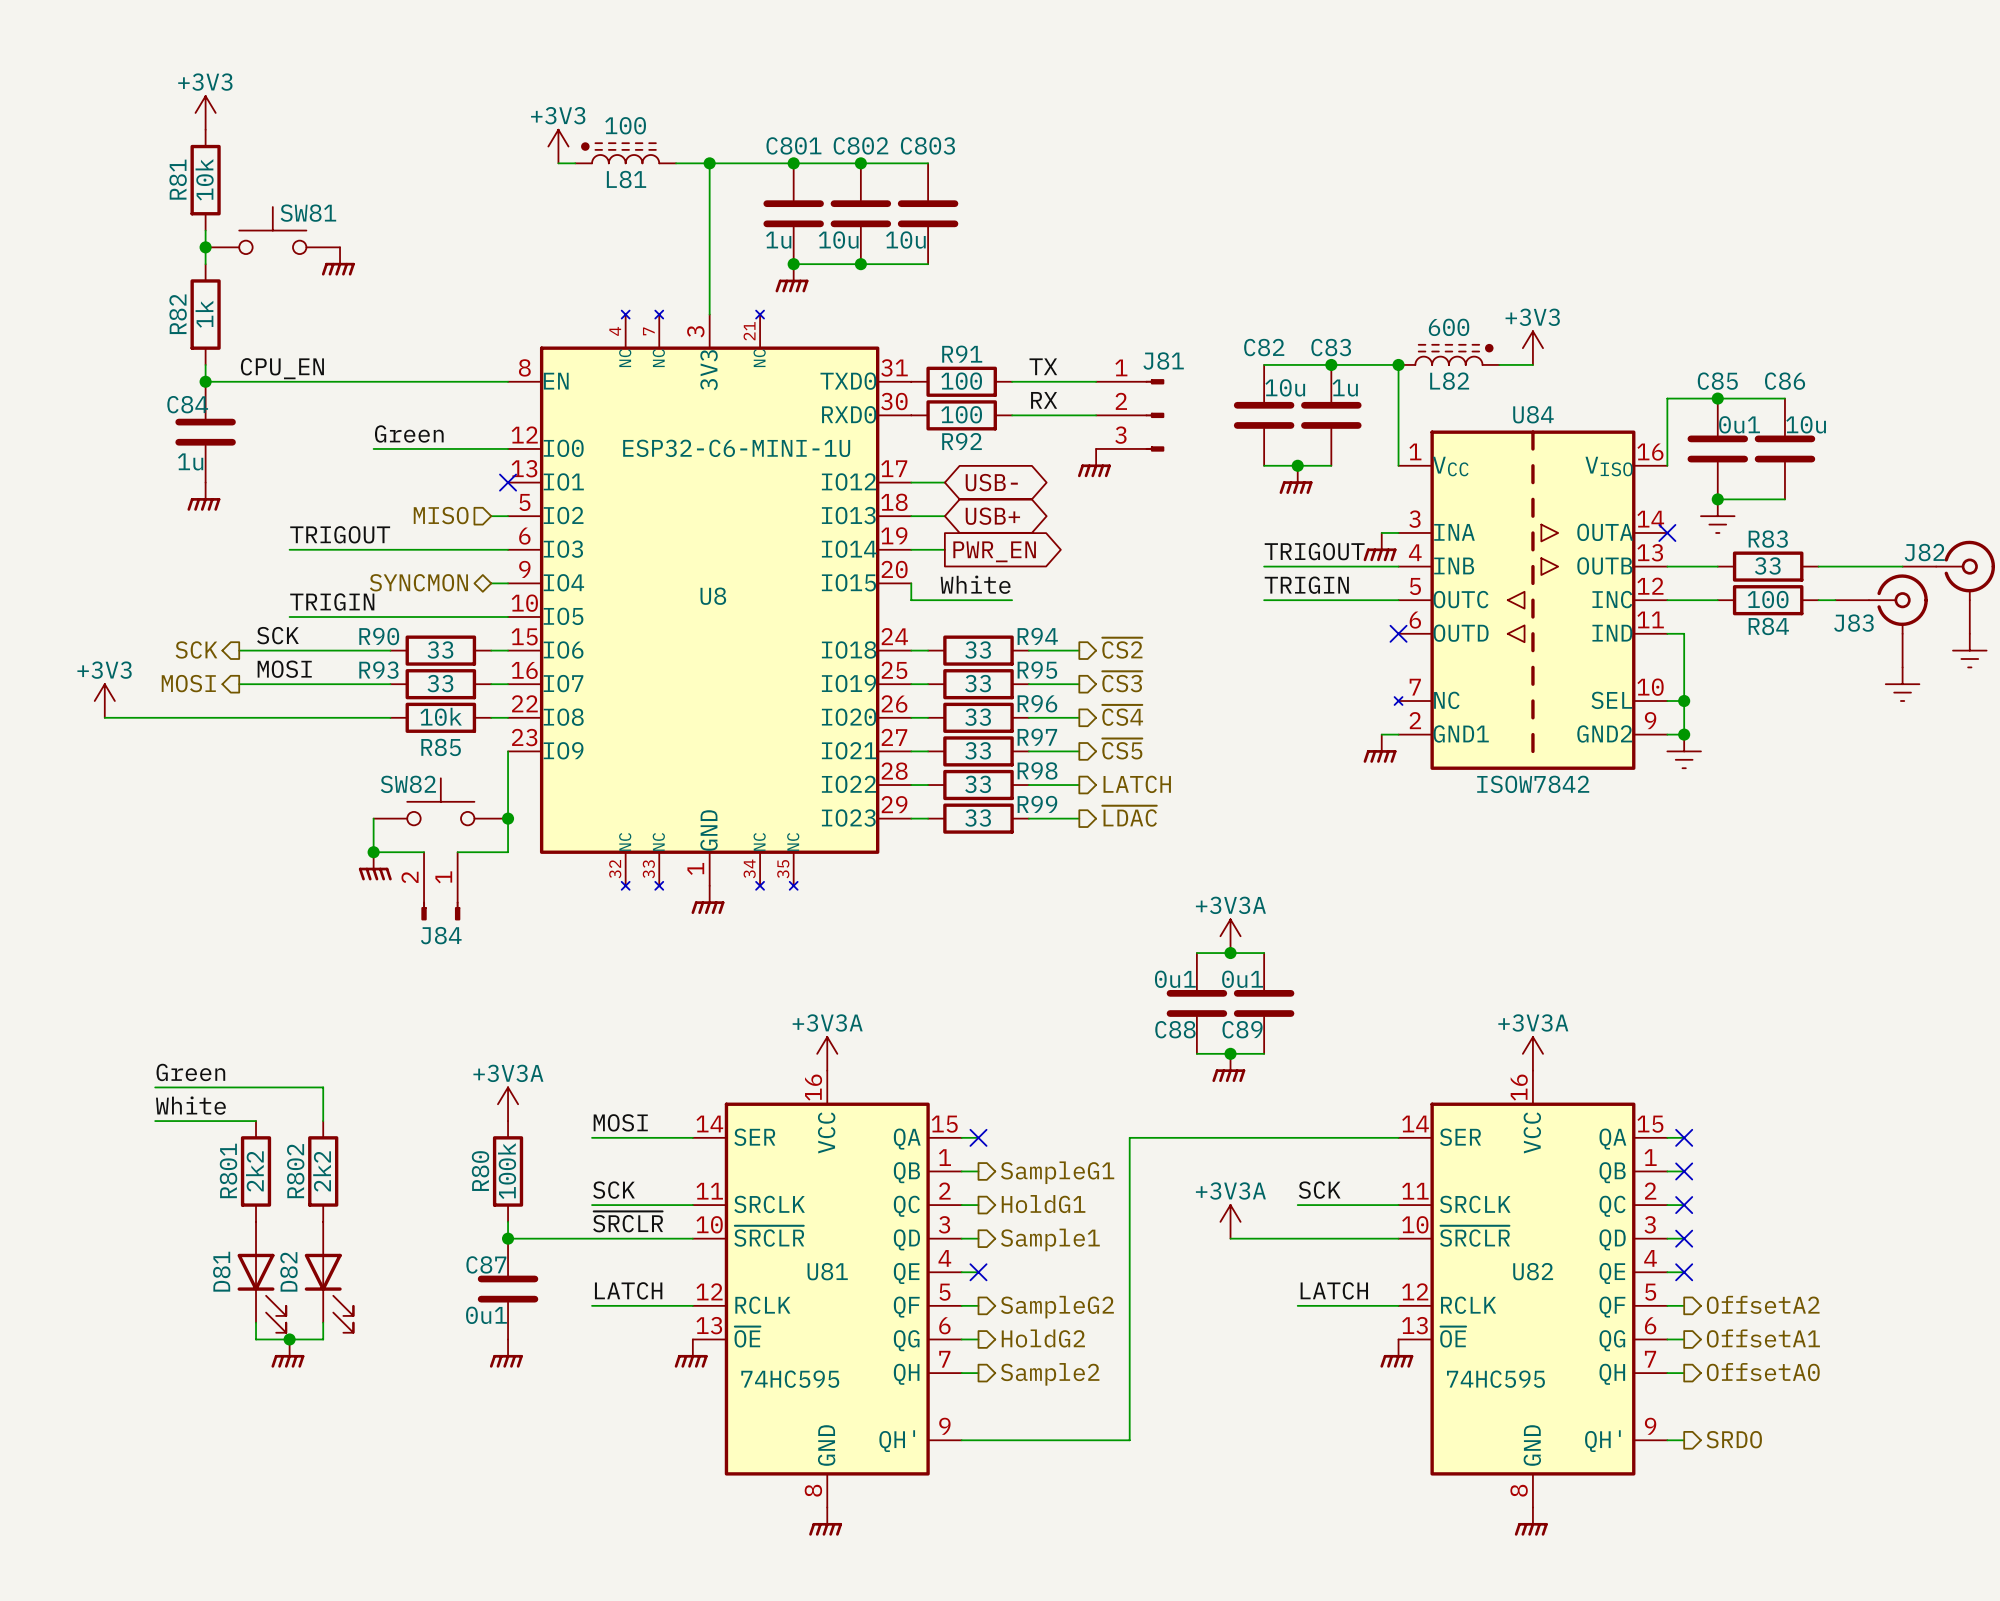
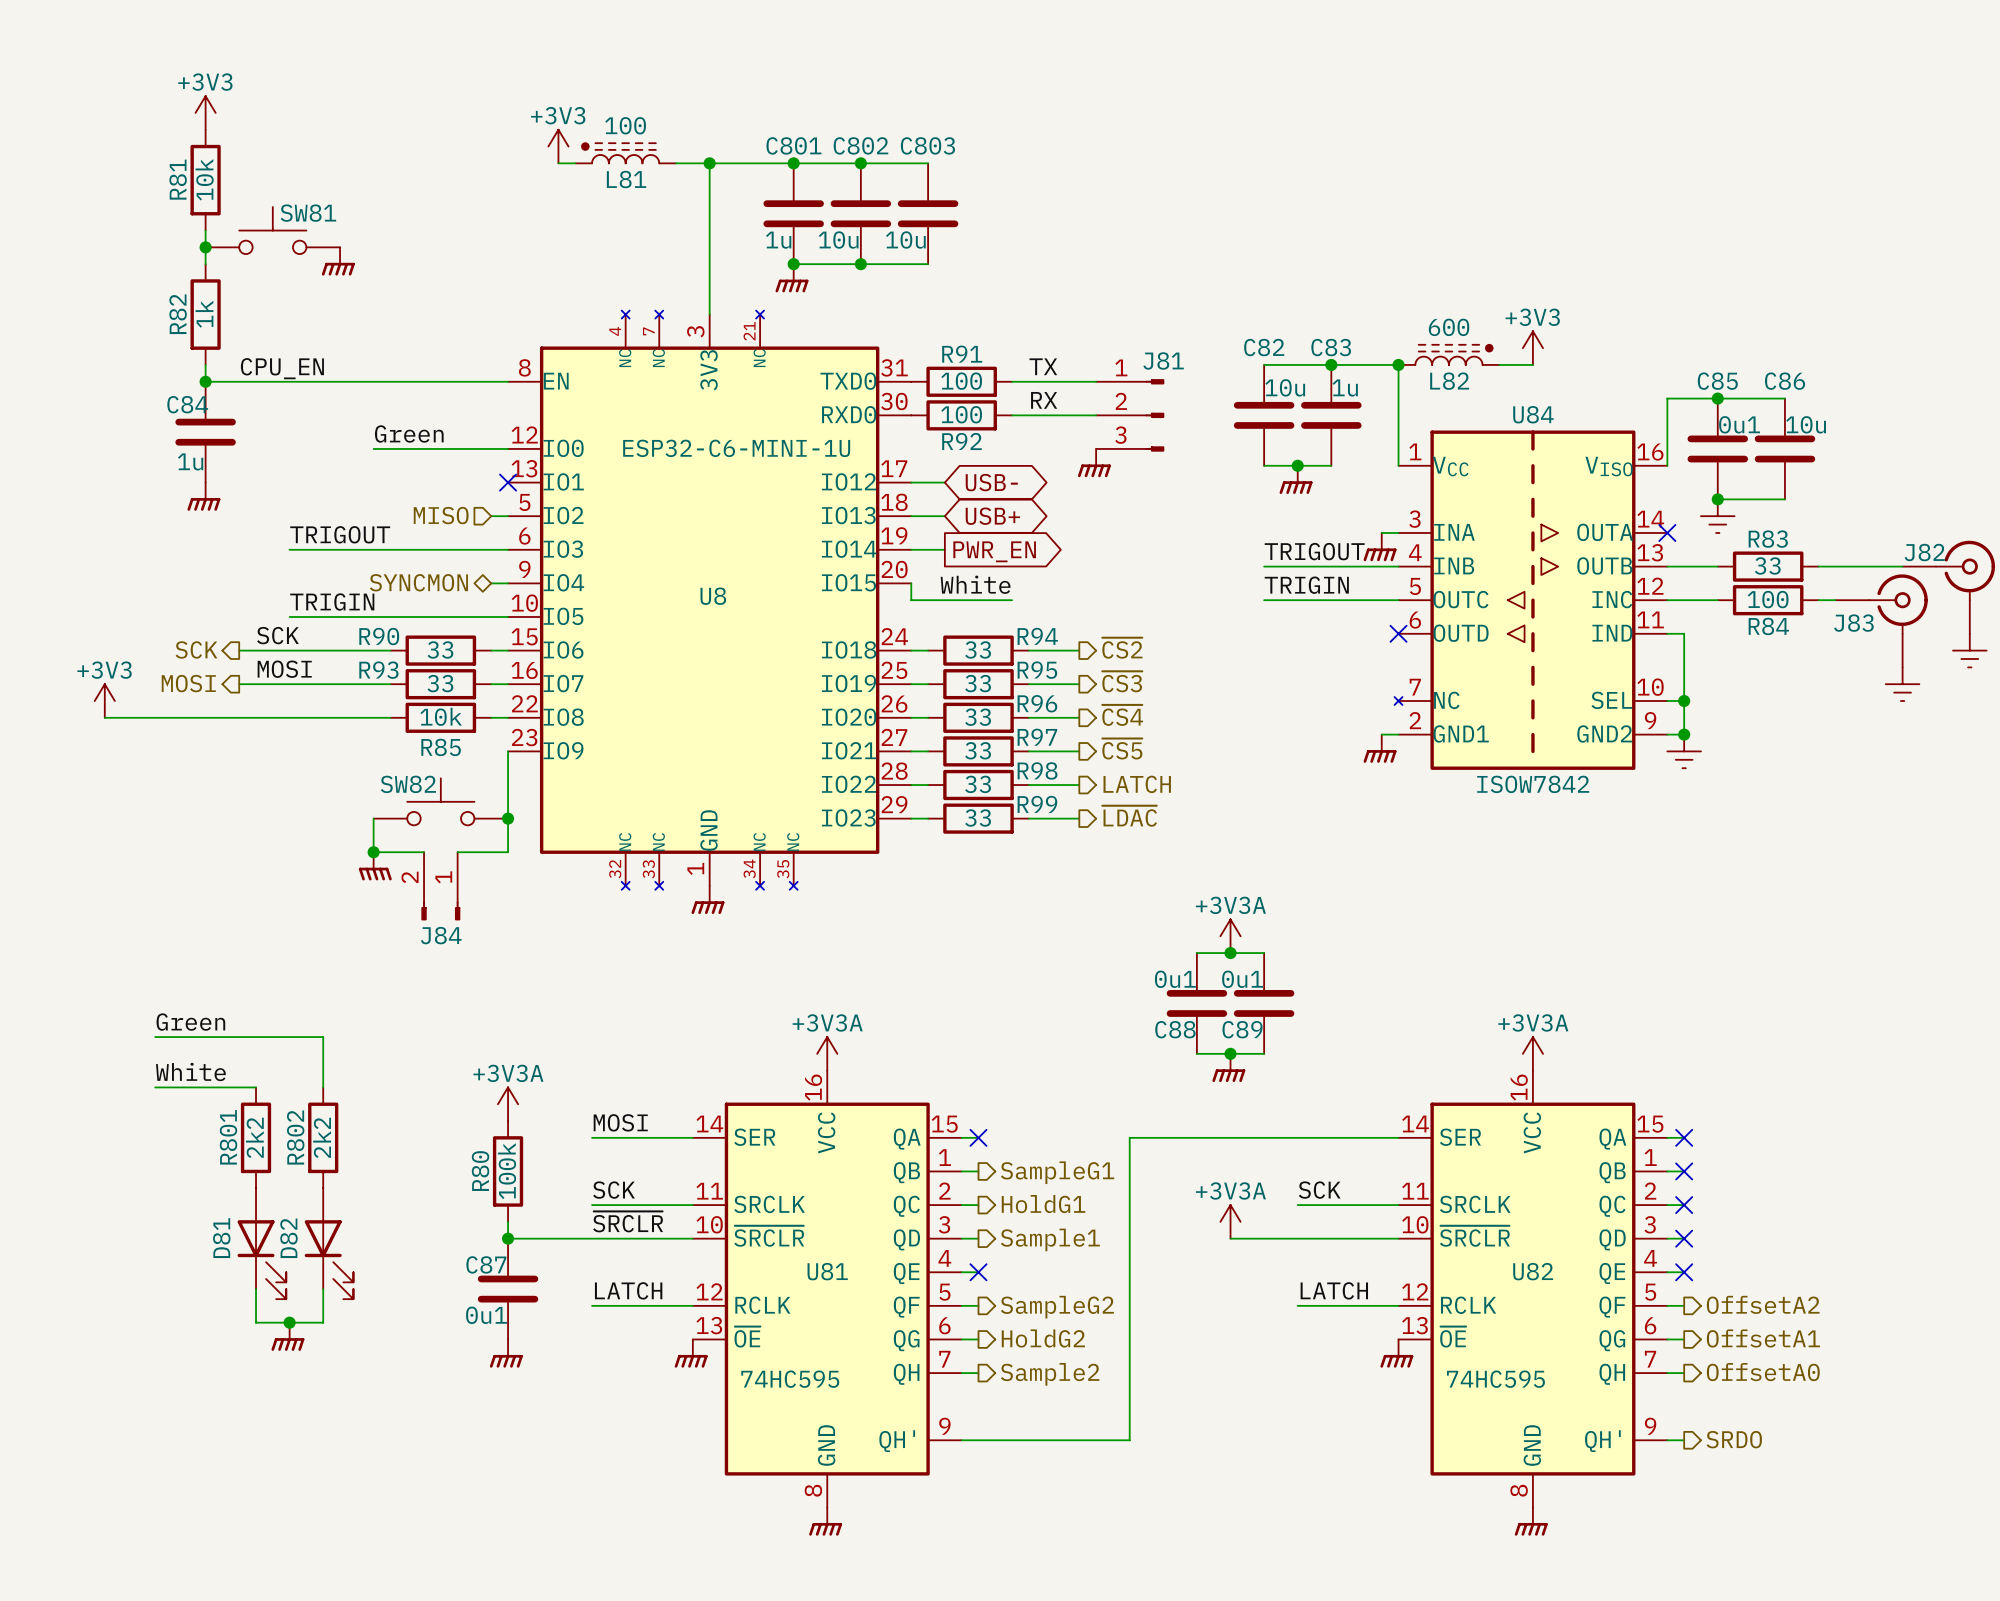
label: none -> Green (190, 1022)
wire: none -> (155, 1037) (323, 1037) (323, 1087)
label: Green (190, 1072) -> White (190, 1072)
wire: (256, 1087) (323, 1087) (323, 1121) -> none
label: White (190, 1105) -> none
wire: (155, 1121) (256, 1121) -> none
R801 position: (256, 1171) -> (256, 1137)
R802 position: (323, 1171) -> (323, 1137)
D81 position: (261, 1277) -> (261, 1243)
D82 position: (329, 1277) -> (329, 1243)
wire: none -> (256, 1289) (256, 1322) (323, 1322) (323, 1289)
wire: (256, 1322) (256, 1339) (323, 1339) (323, 1322) -> none
junction position: (289, 1339) -> (289, 1322)
power symbol position: (287, 1353) -> (287, 1336)

